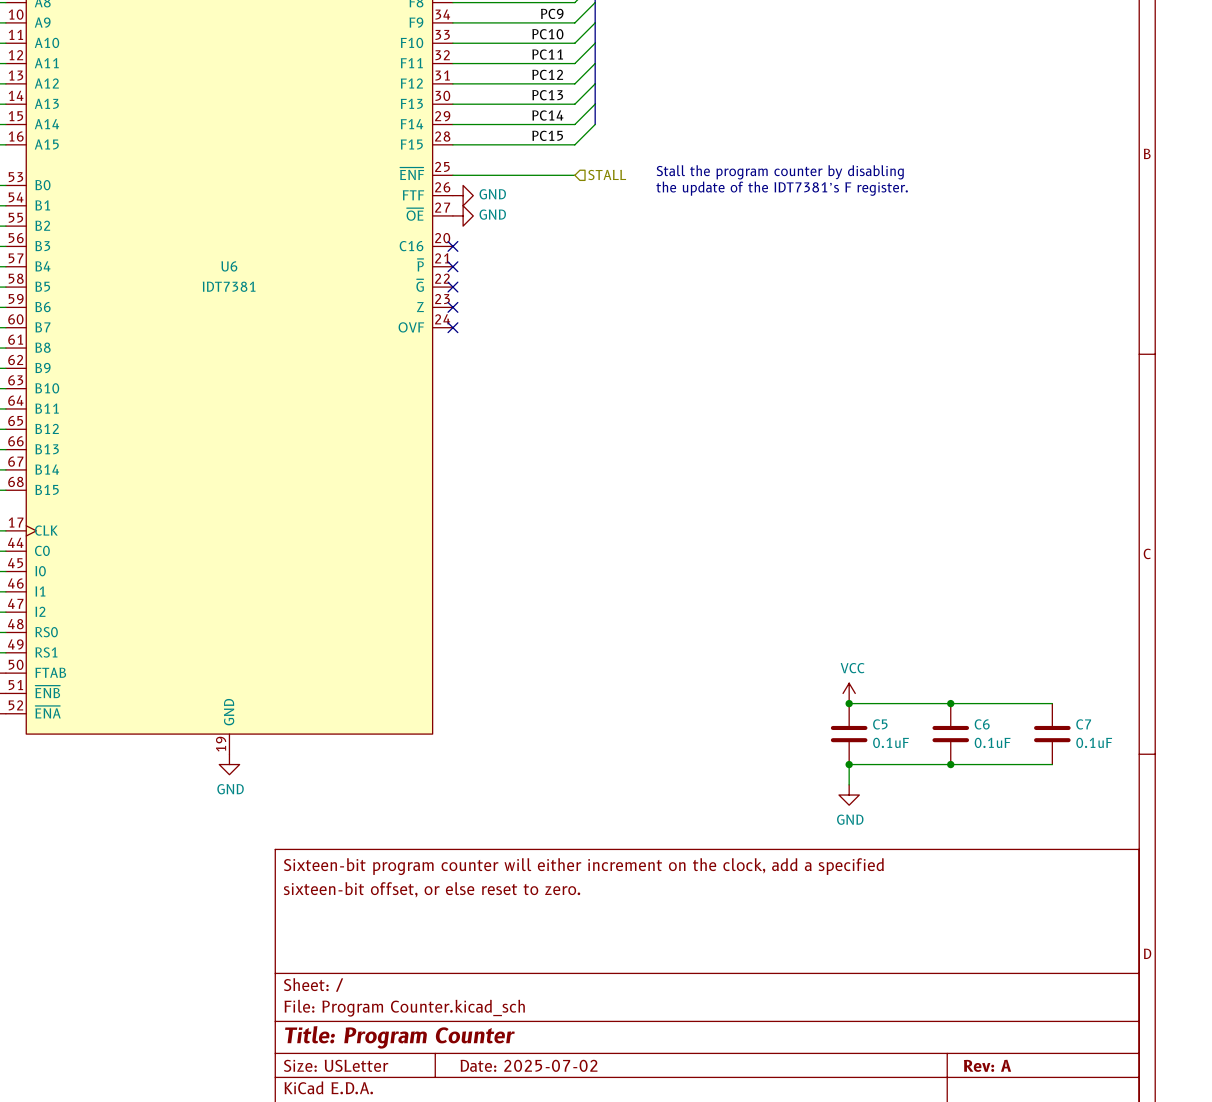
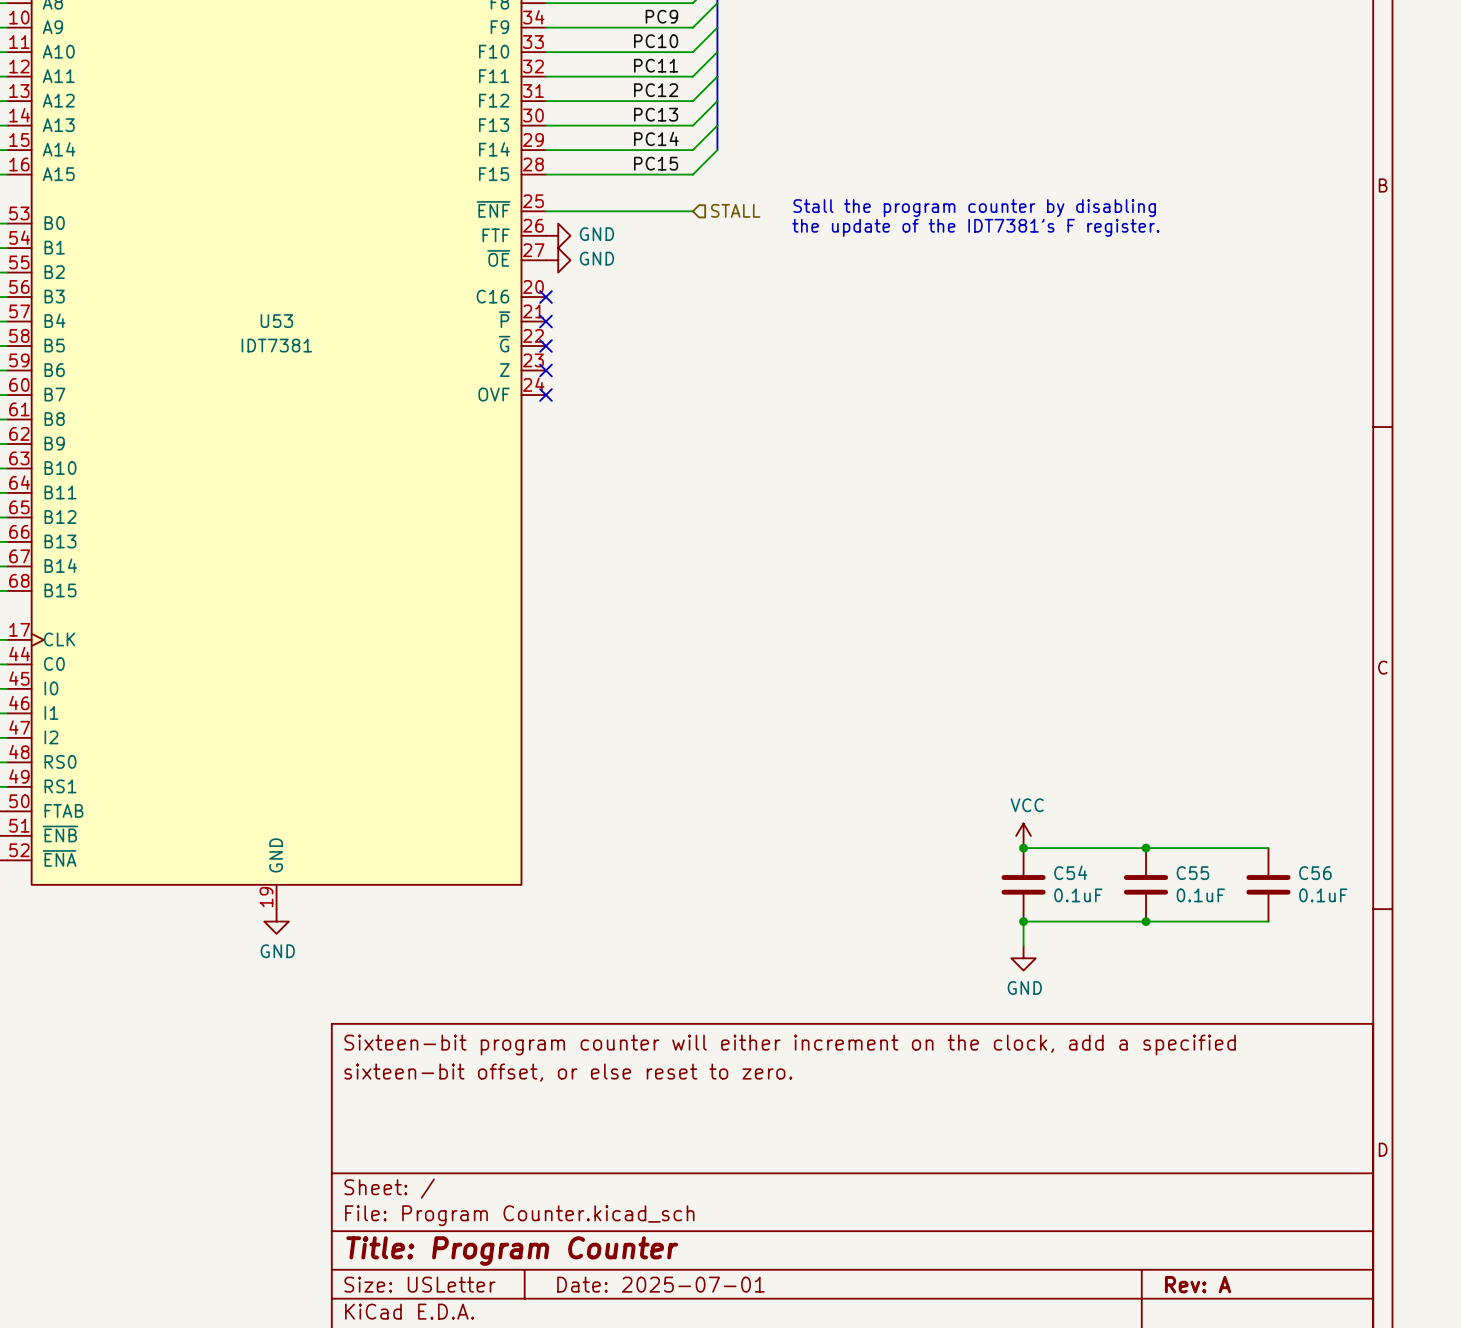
U6 name: U6 (229, 266) -> U53 (276, 321)
C5 name: C5 (880, 724) -> C54 (1070, 872)
C6 name: C6 (982, 724) -> C55 (1192, 873)
C7 name: C7 (1083, 724) -> C56 (1315, 873)
title block: Date: 2025-07-02 (529, 1065) -> Date: 2025-07-01 (660, 1284)

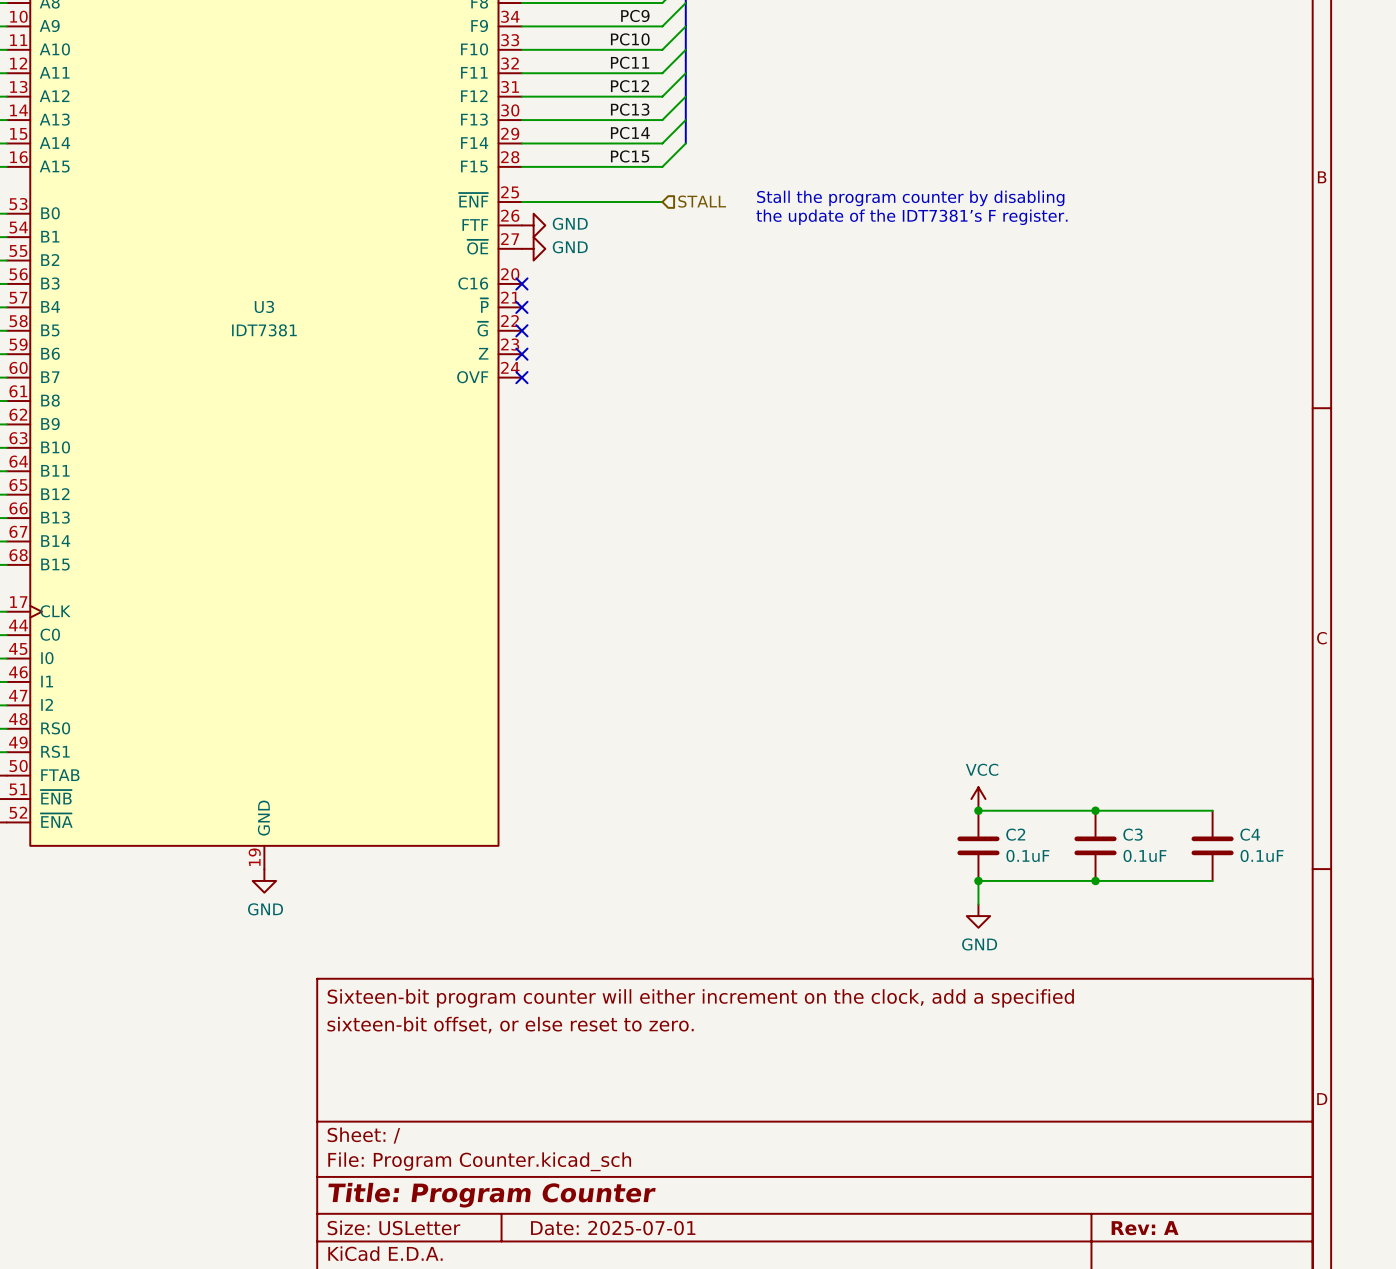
U53 name: U53 (276, 321) -> U3 (264, 306)
C54 name: C54 (1070, 872) -> C2 (1015, 834)
C55 name: C55 (1192, 873) -> C3 (1132, 834)
C56 name: C56 (1315, 873) -> C4 (1250, 834)

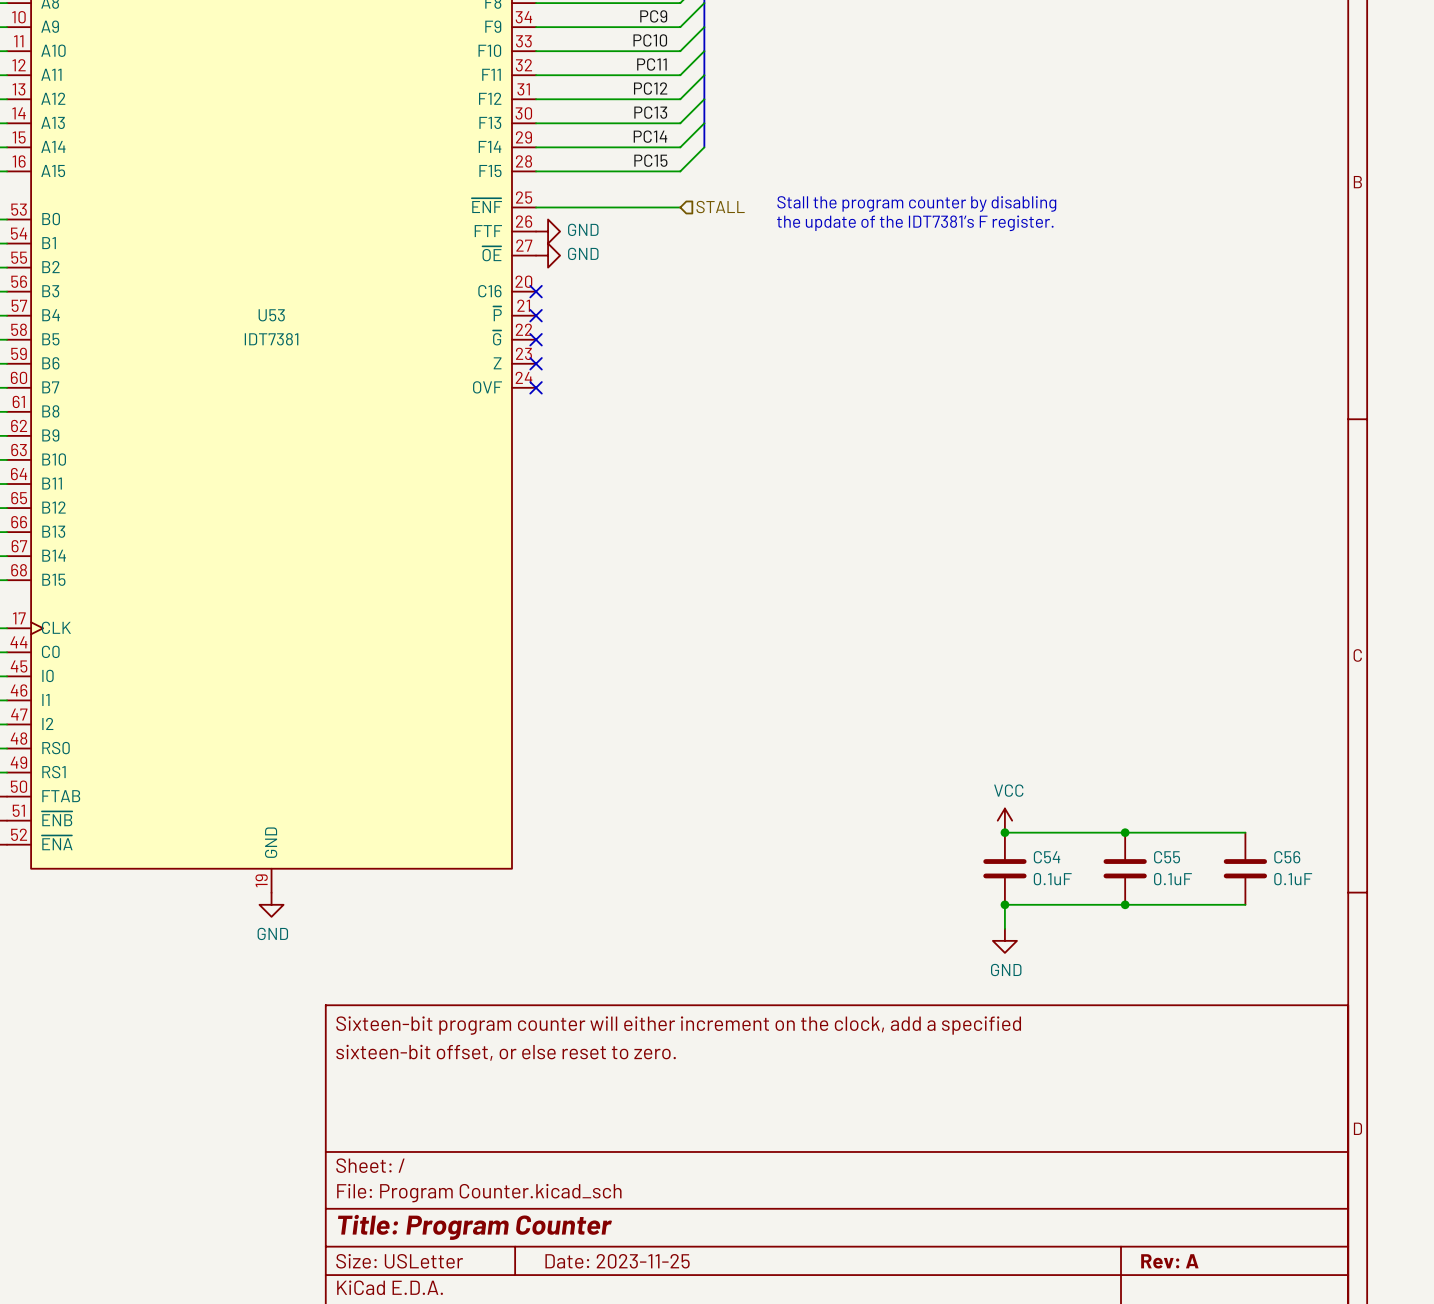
U3 name: U3 (264, 306) -> U53 (271, 315)
C2 name: C2 (1015, 834) -> C54 (1047, 857)
C3 name: C3 (1132, 834) -> C55 (1167, 857)
C4 name: C4 (1250, 834) -> C56 (1287, 857)
title block: Date: 2025-07-01 (613, 1228) -> Date: 2023-11-25 (617, 1261)

